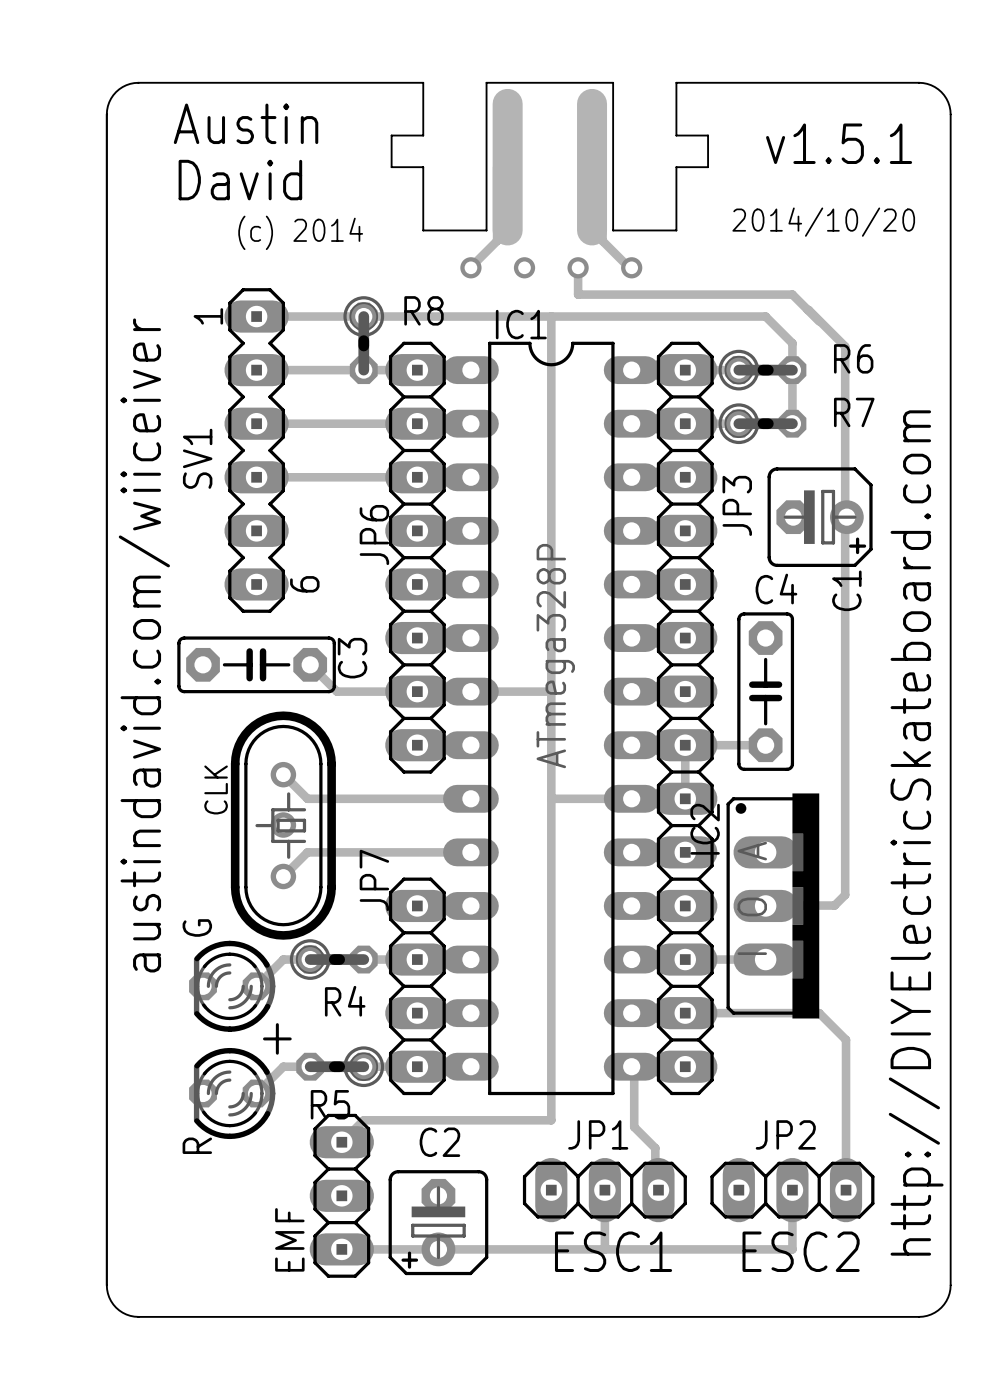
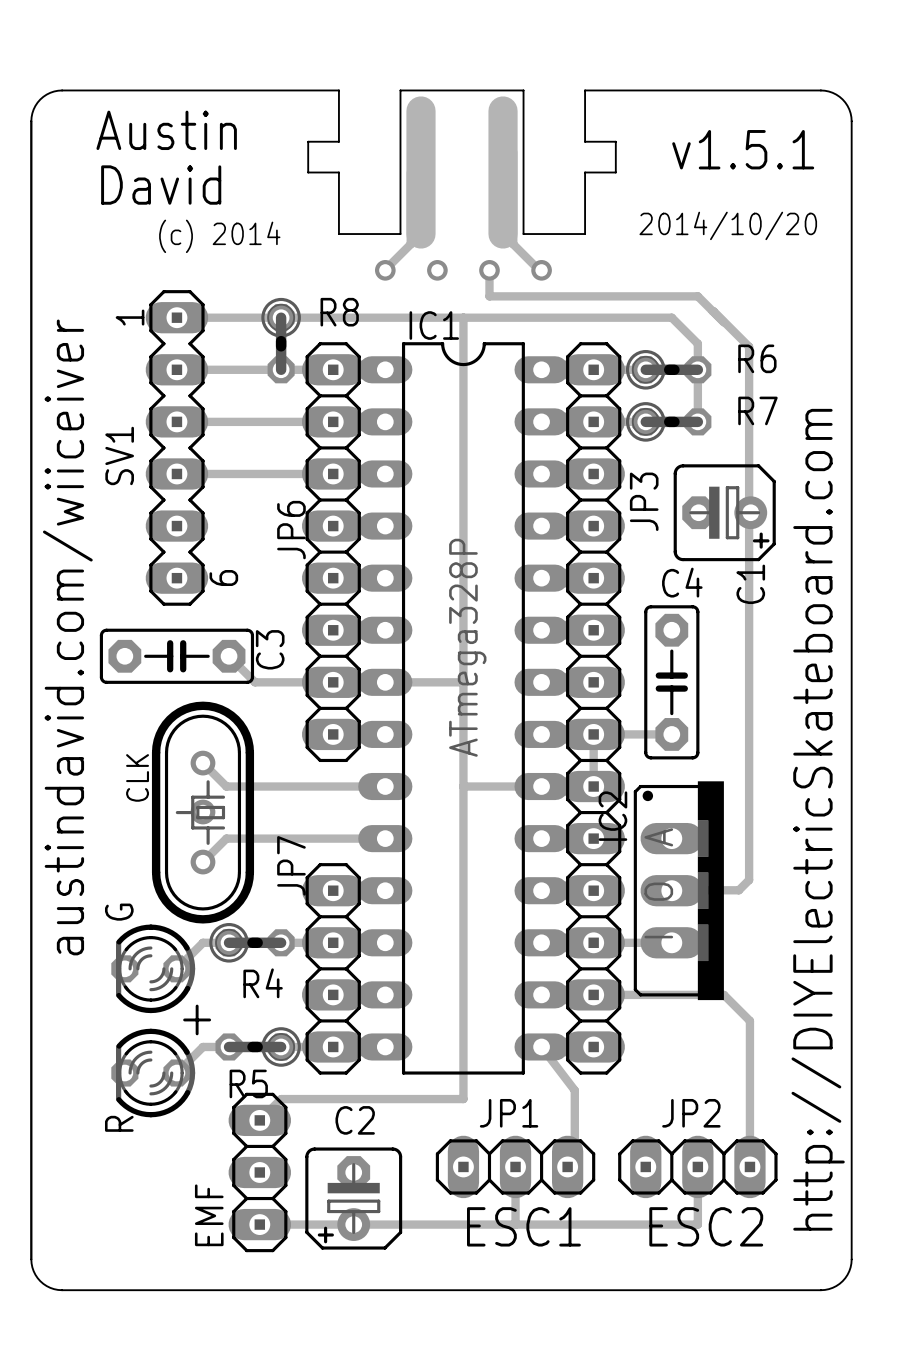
track: none -> (541, 1046) (574, 1090) (574, 1177)
track: (634, 1069) (634, 1127) (655, 1148) (655, 1186) (658, 1190) -> none

